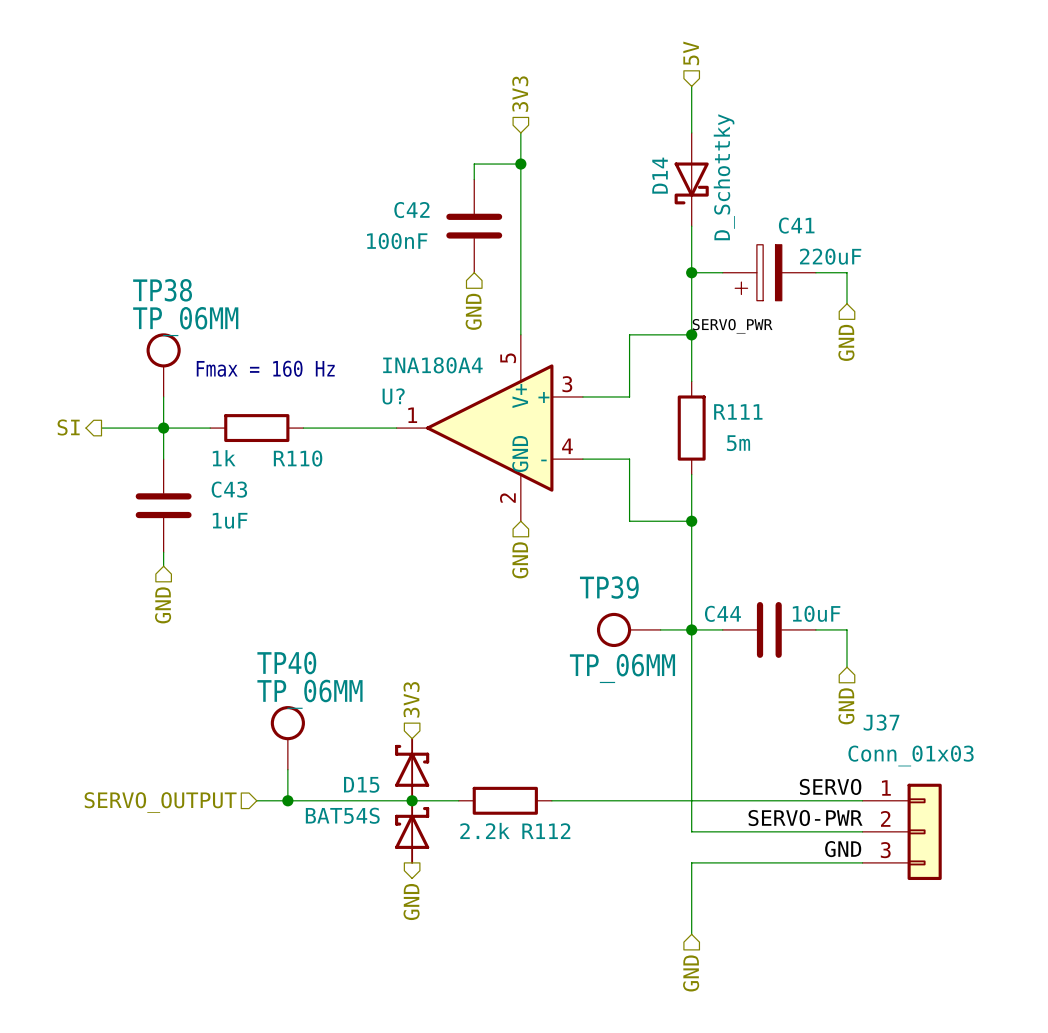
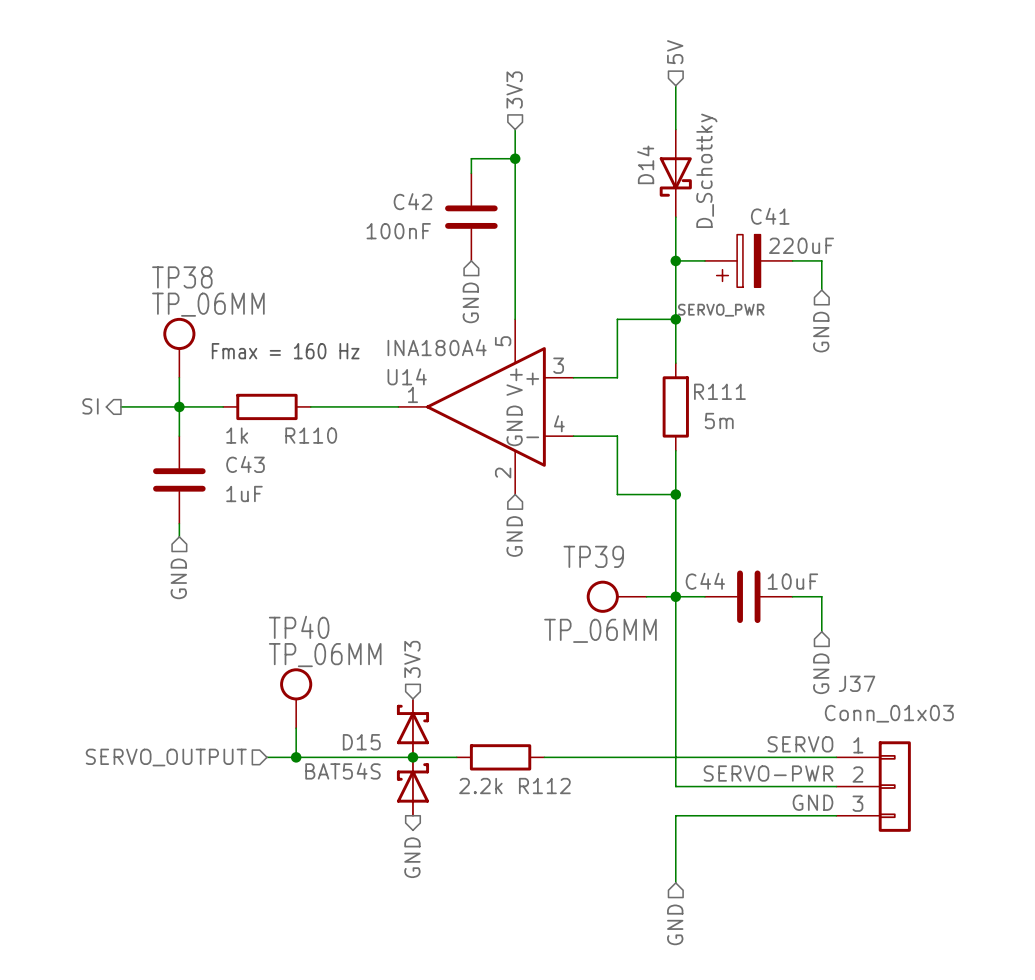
U? name: U? (393, 396) -> U14 (407, 376)

